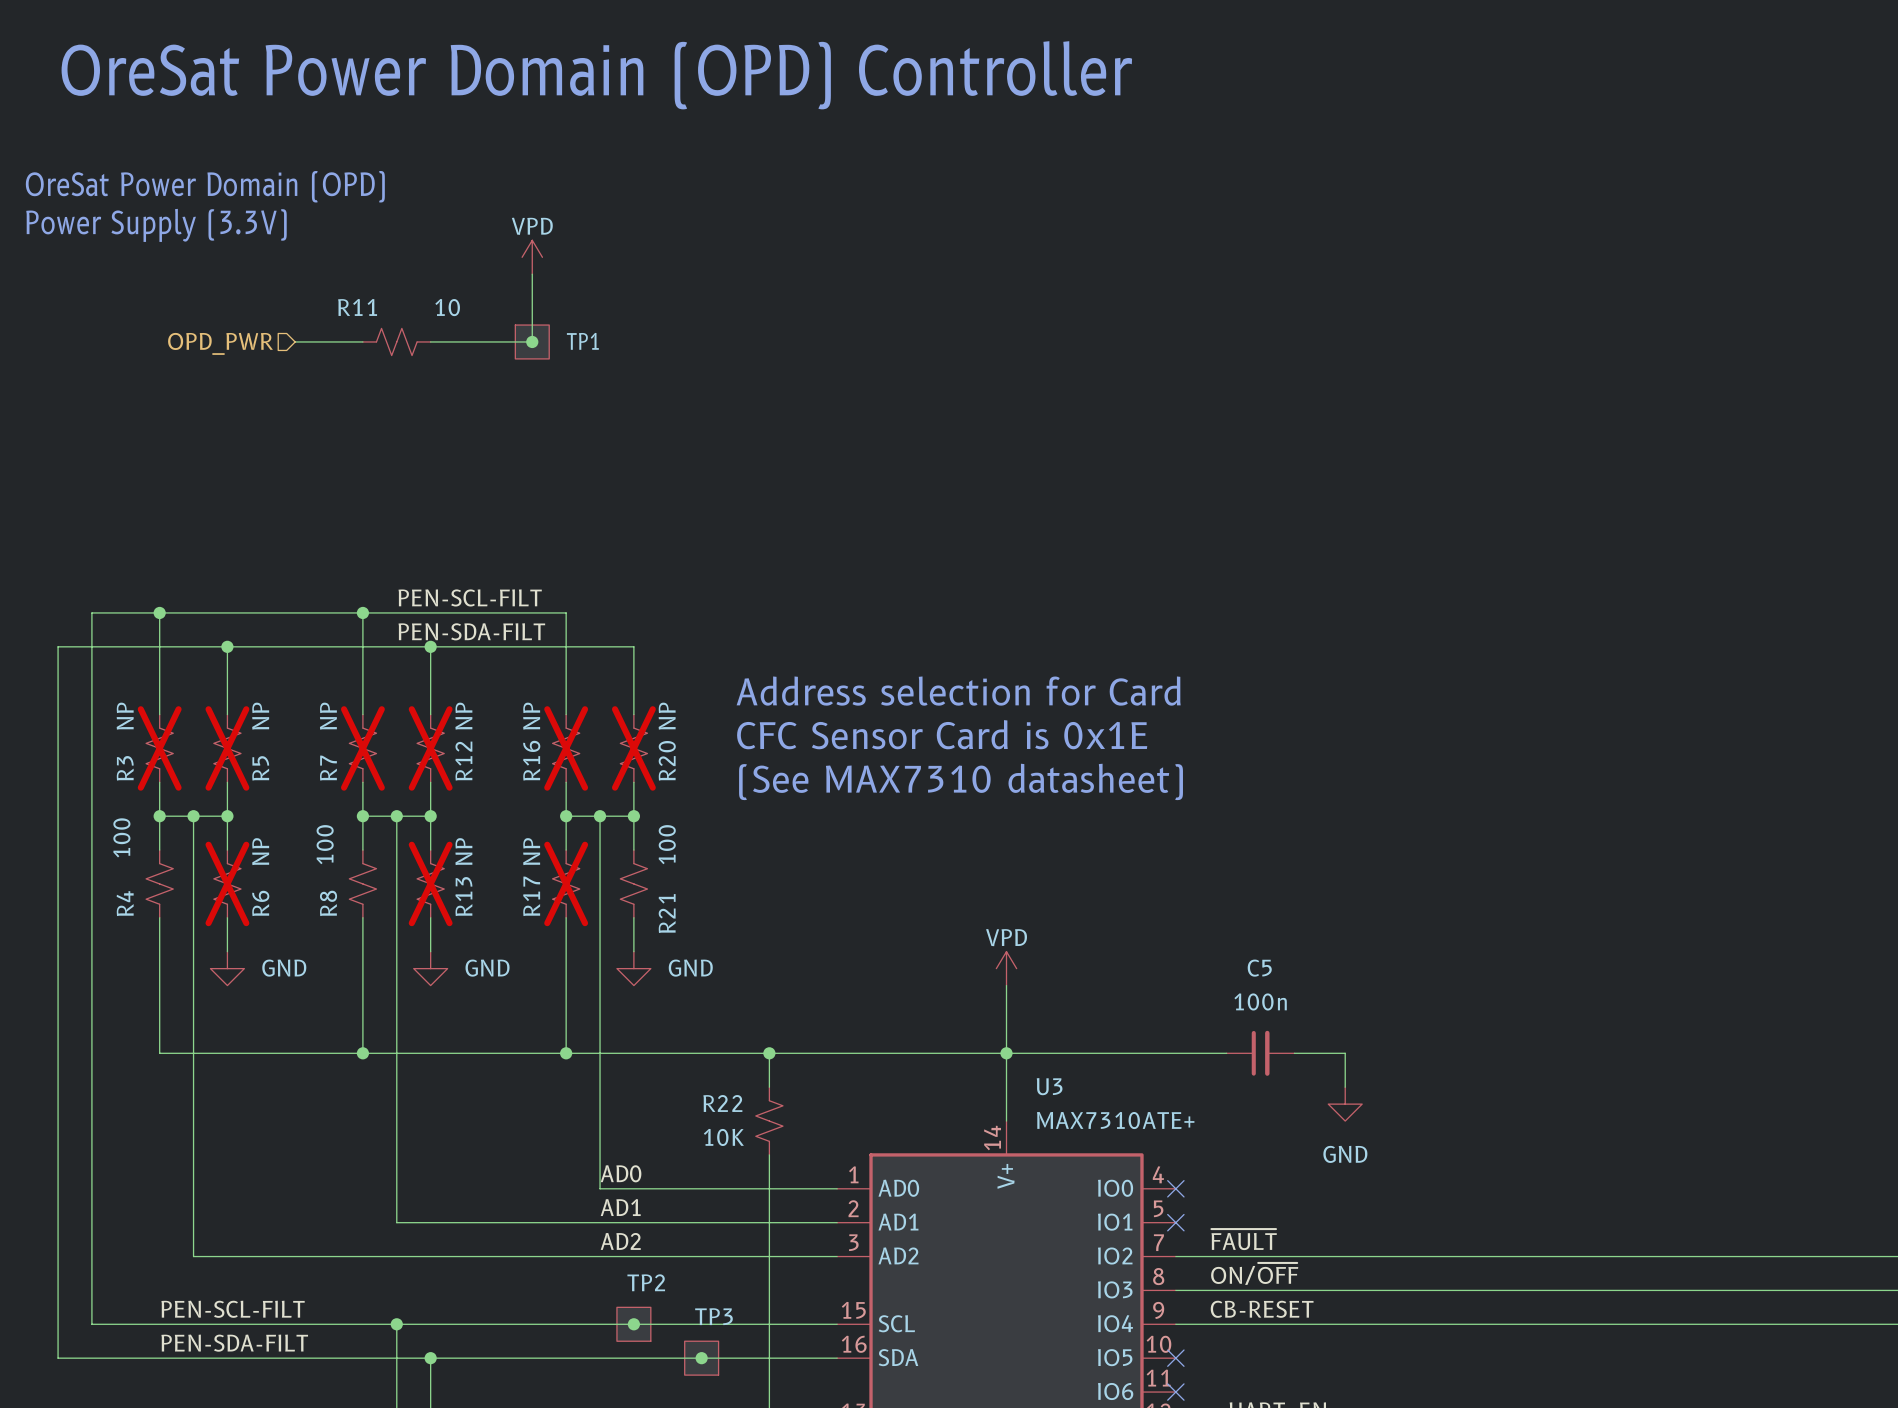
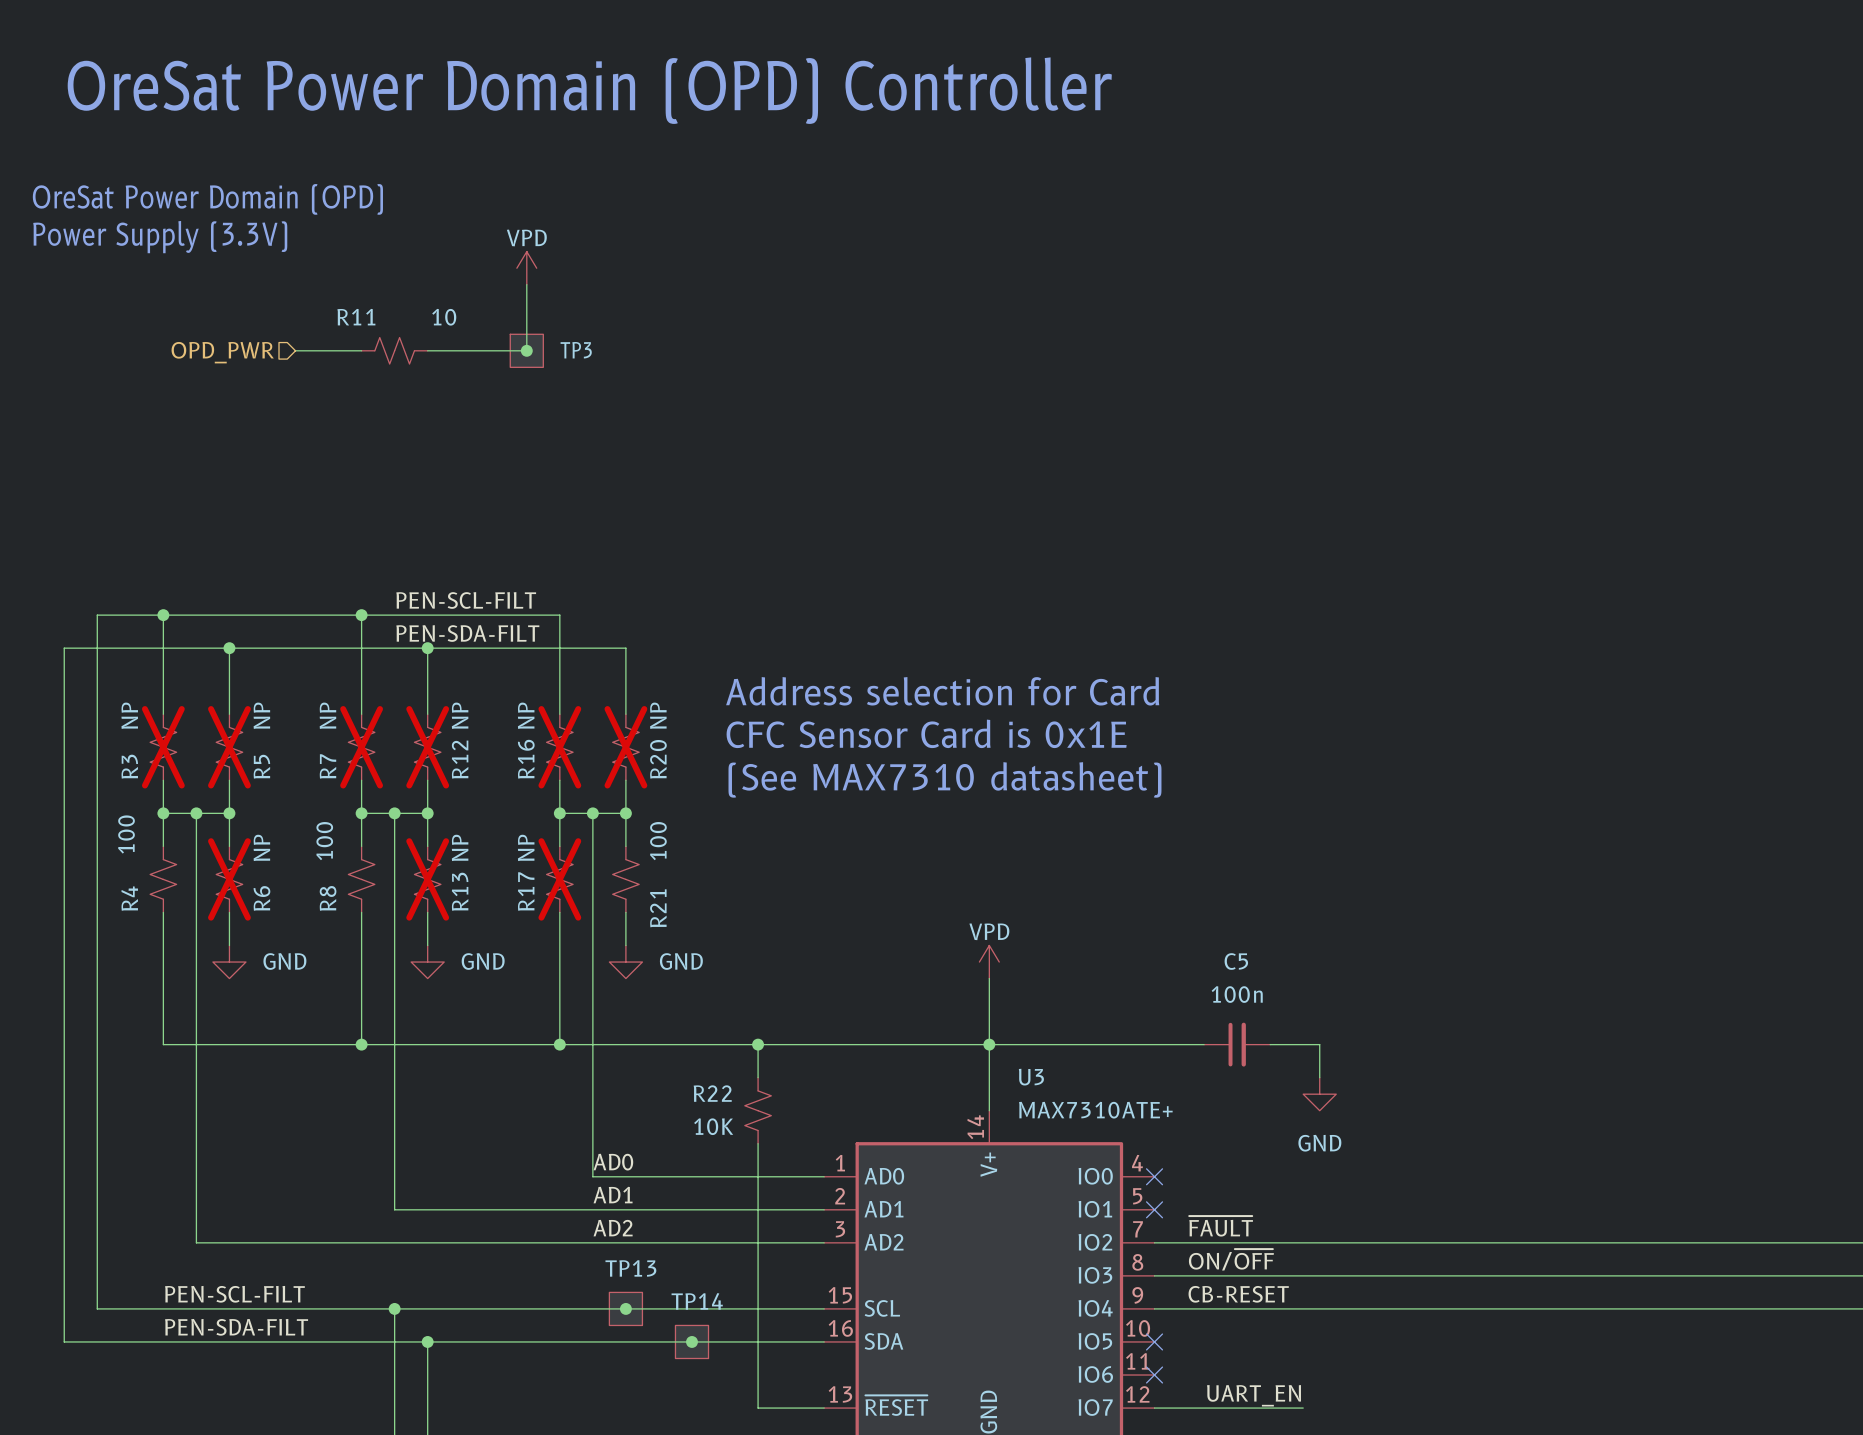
TP1 name: TP1 (582, 341) -> TP3 (576, 350)
TP2 name: TP2 (646, 1282) -> TP13 (630, 1268)
TP3 name: TP3 (714, 1316) -> TP14 (697, 1301)

